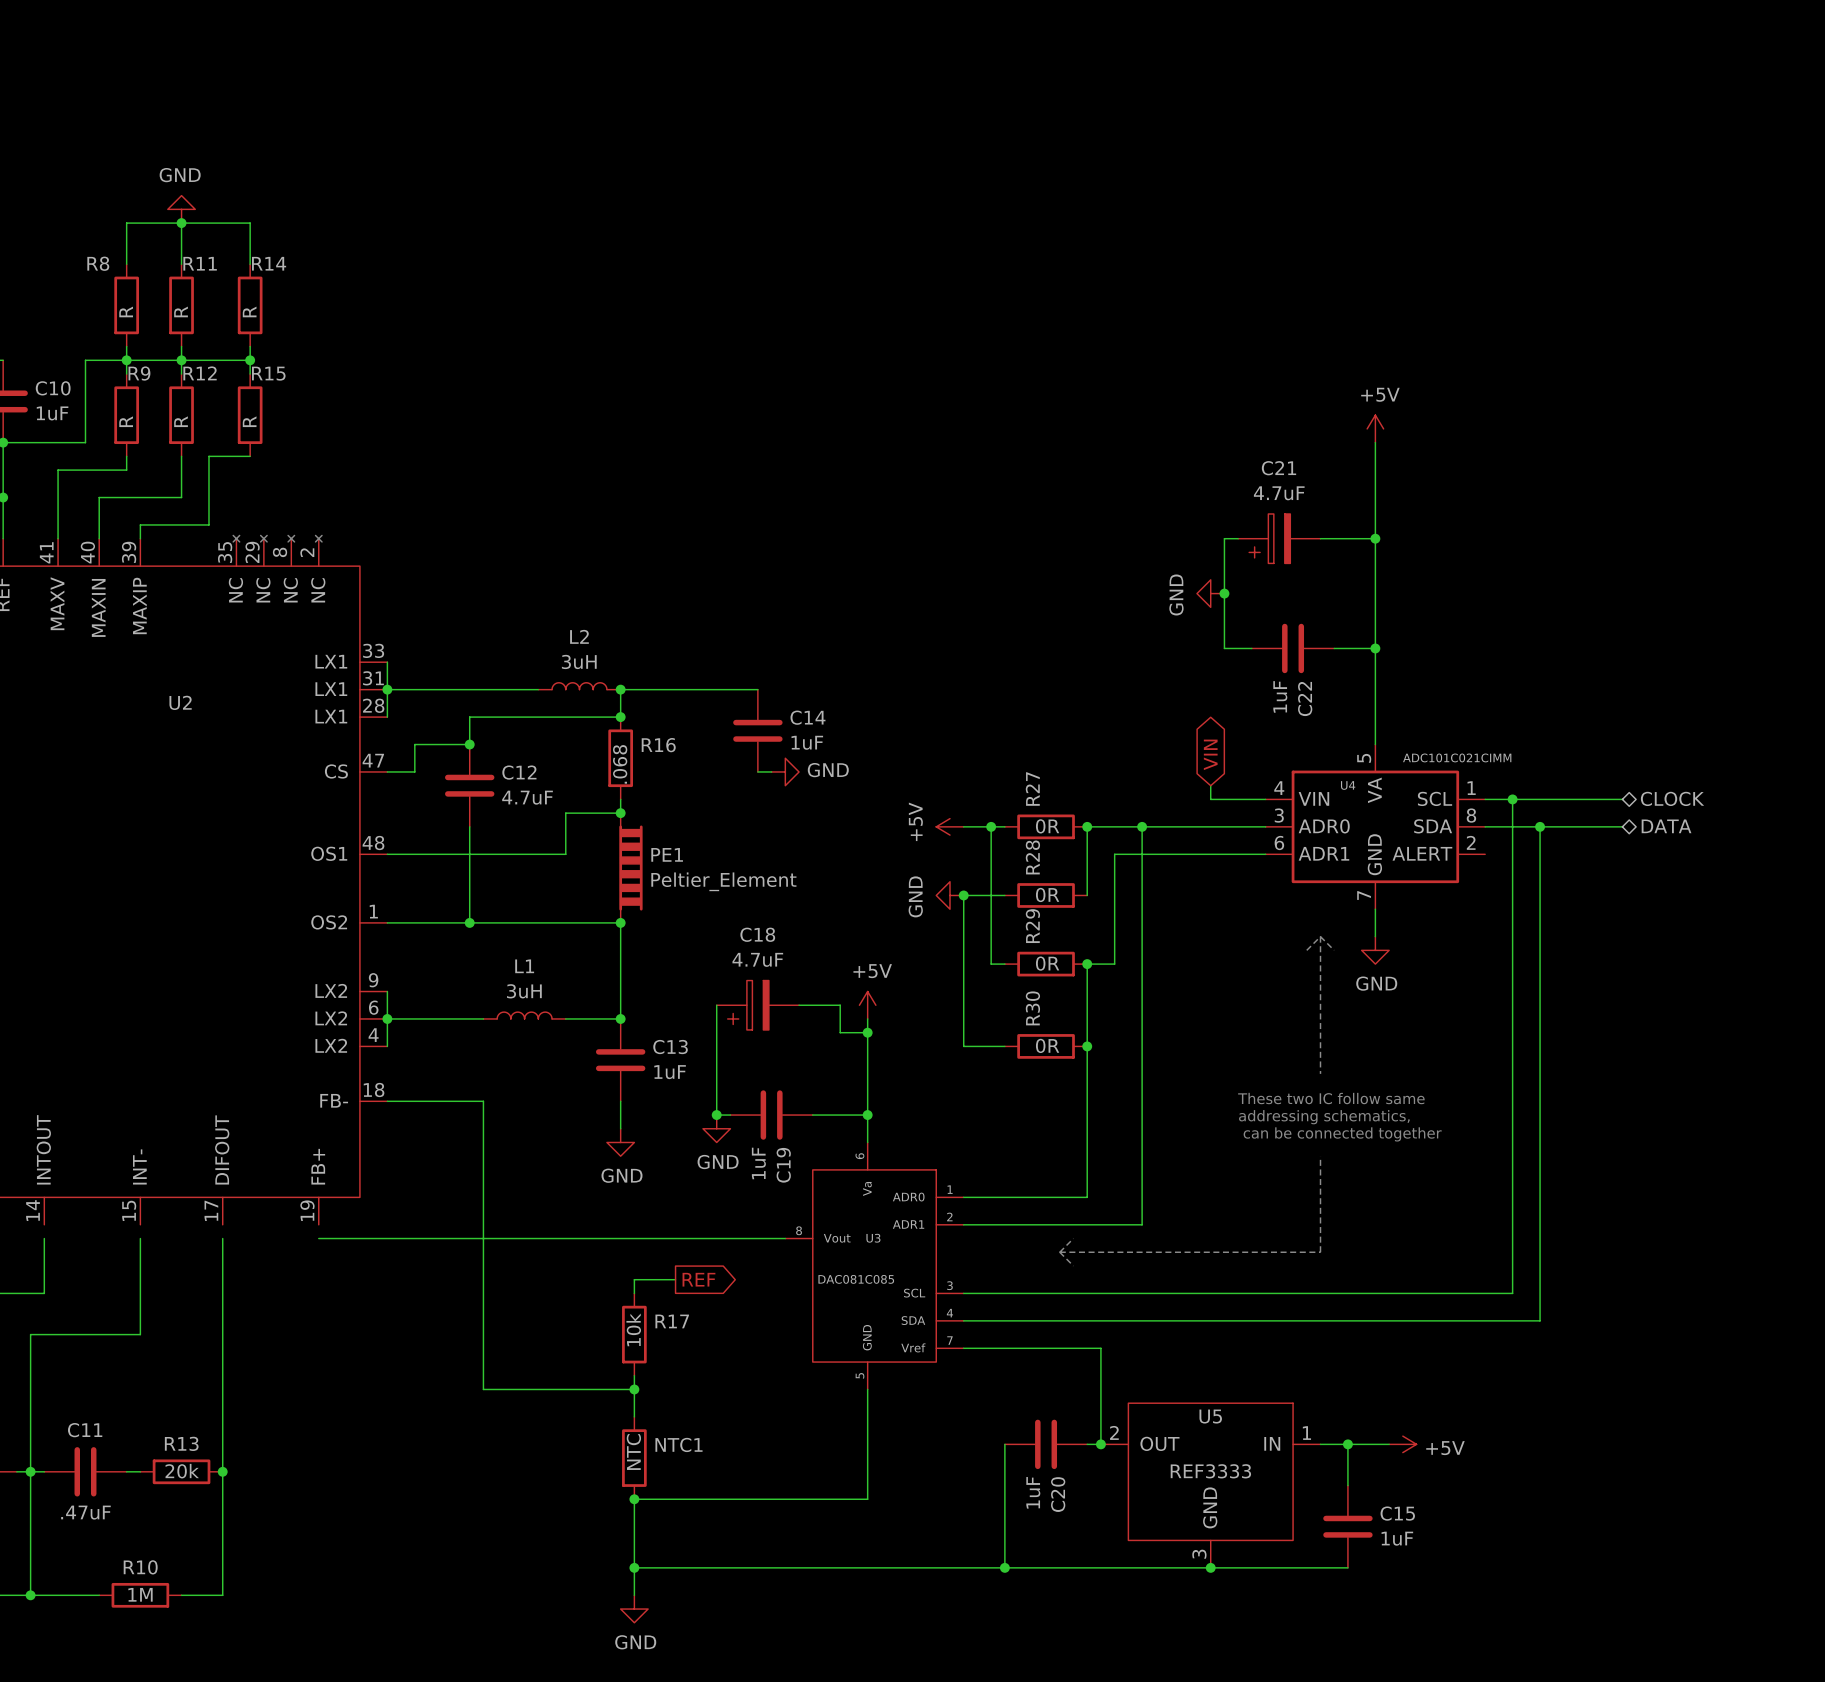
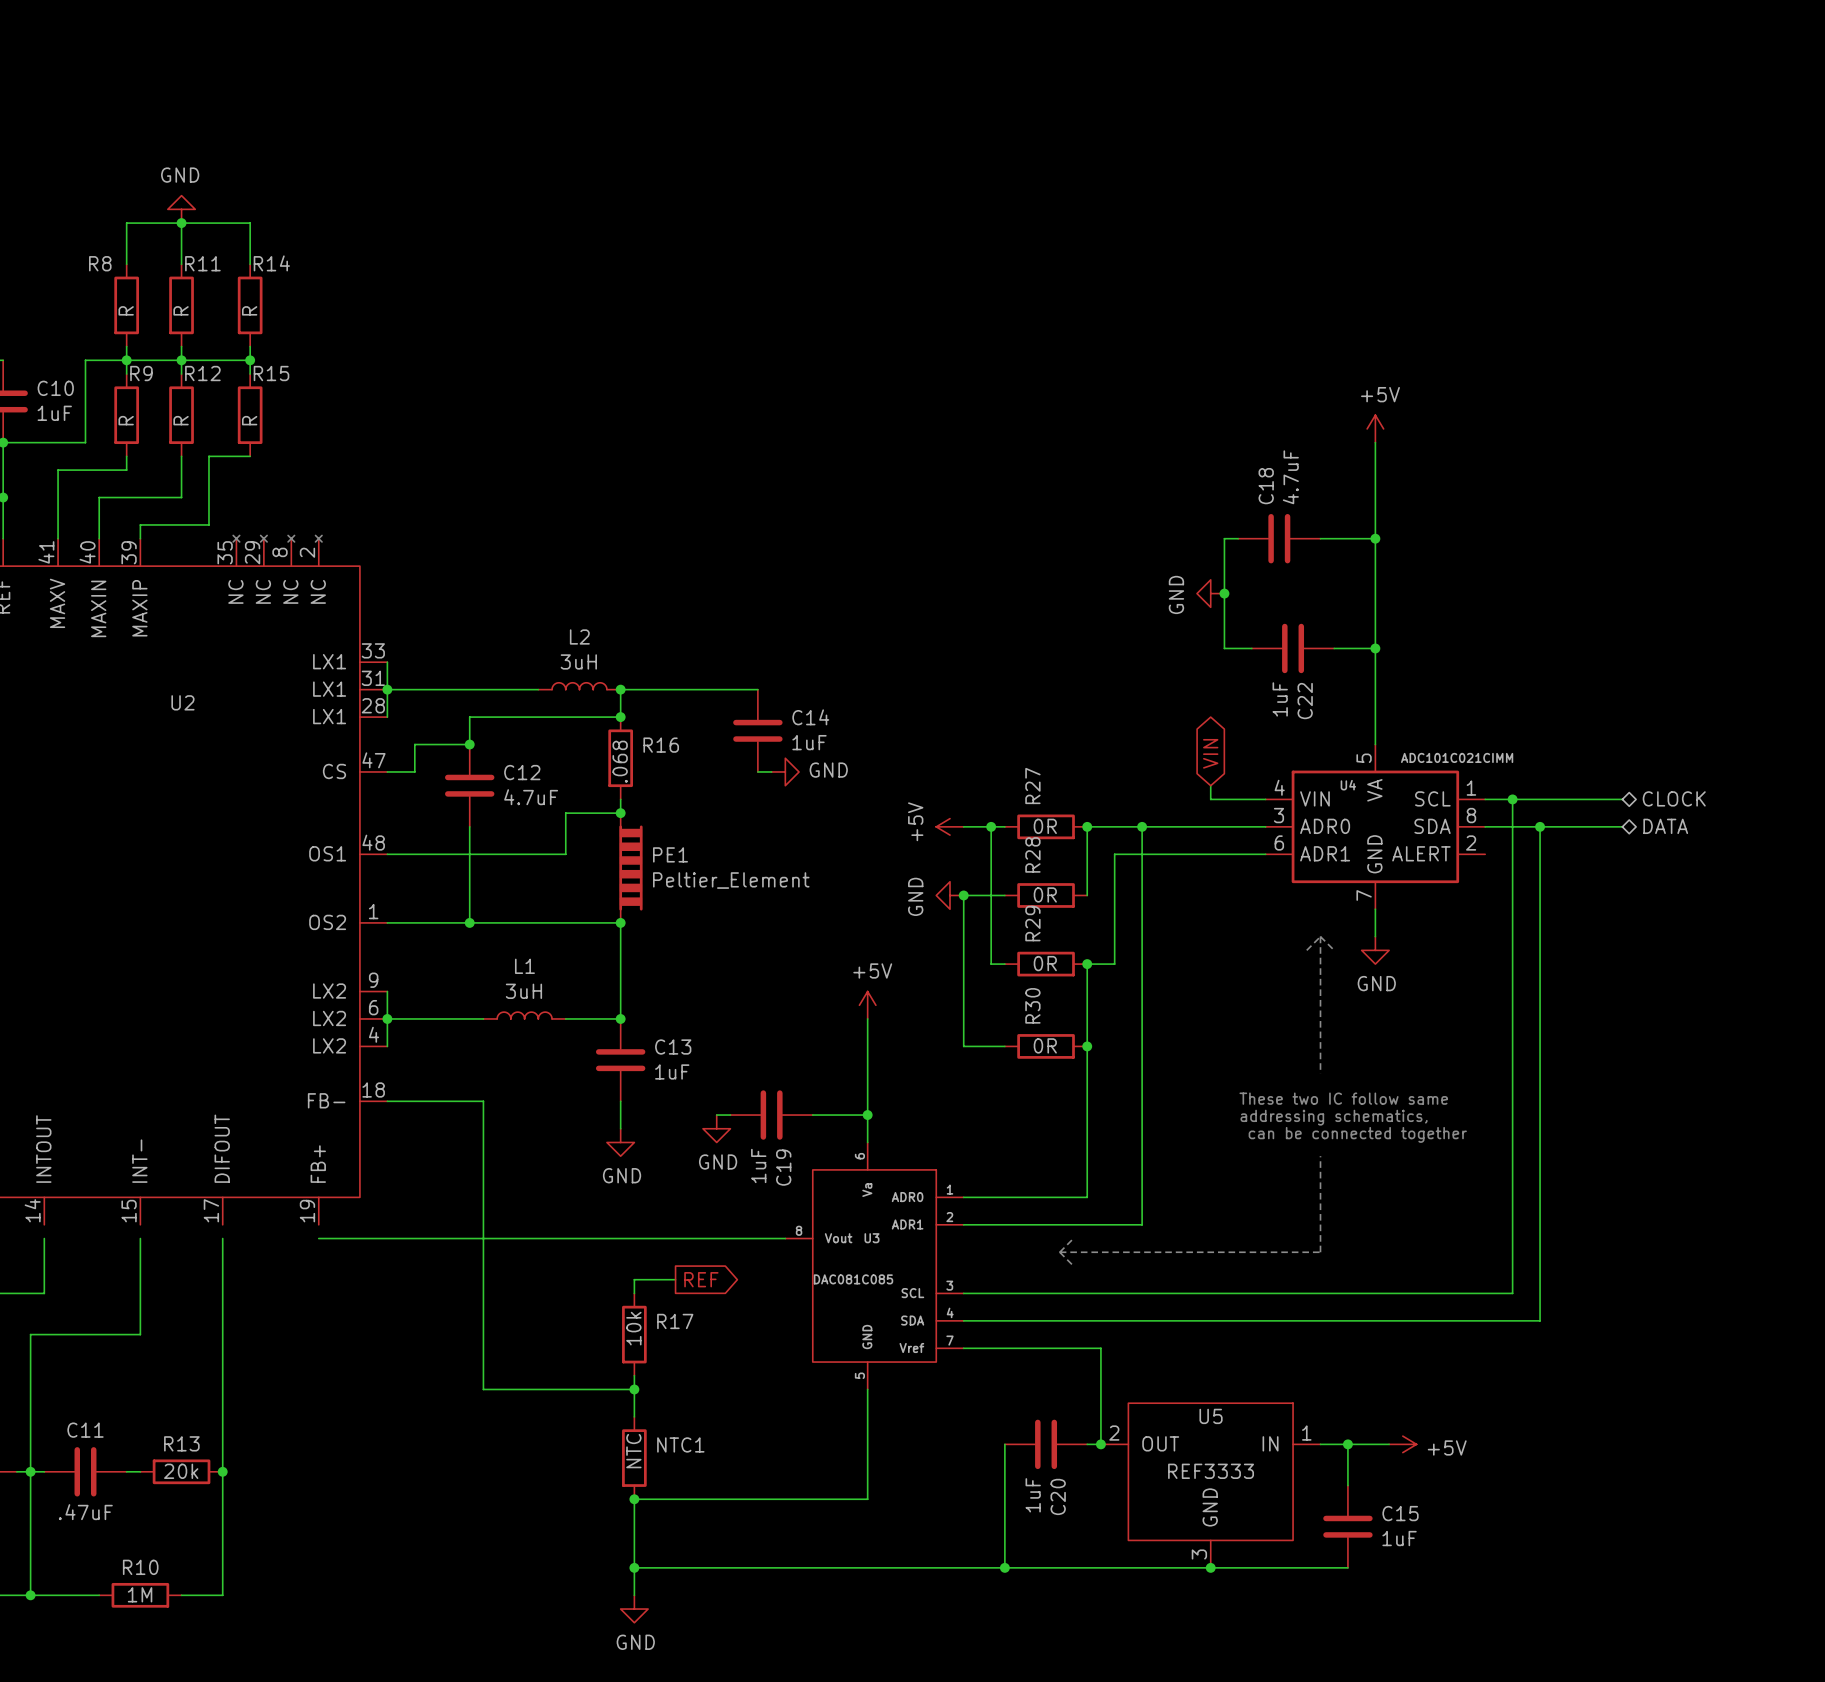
C21: 4.7uF (1279, 538) -> none
C18 value position: 4.7uF (757, 959) -> 4.7uF (1290, 477)
C18 symbol: [716, 980, 800, 1030] -> [1238, 513, 1321, 564]
wire: (716, 1005) (716, 1115) -> none
wire: (799, 1005) (840, 1005) (840, 1032) (867, 1032) -> none
junction: (867, 1032) -> none
junction: (716, 1115) -> none

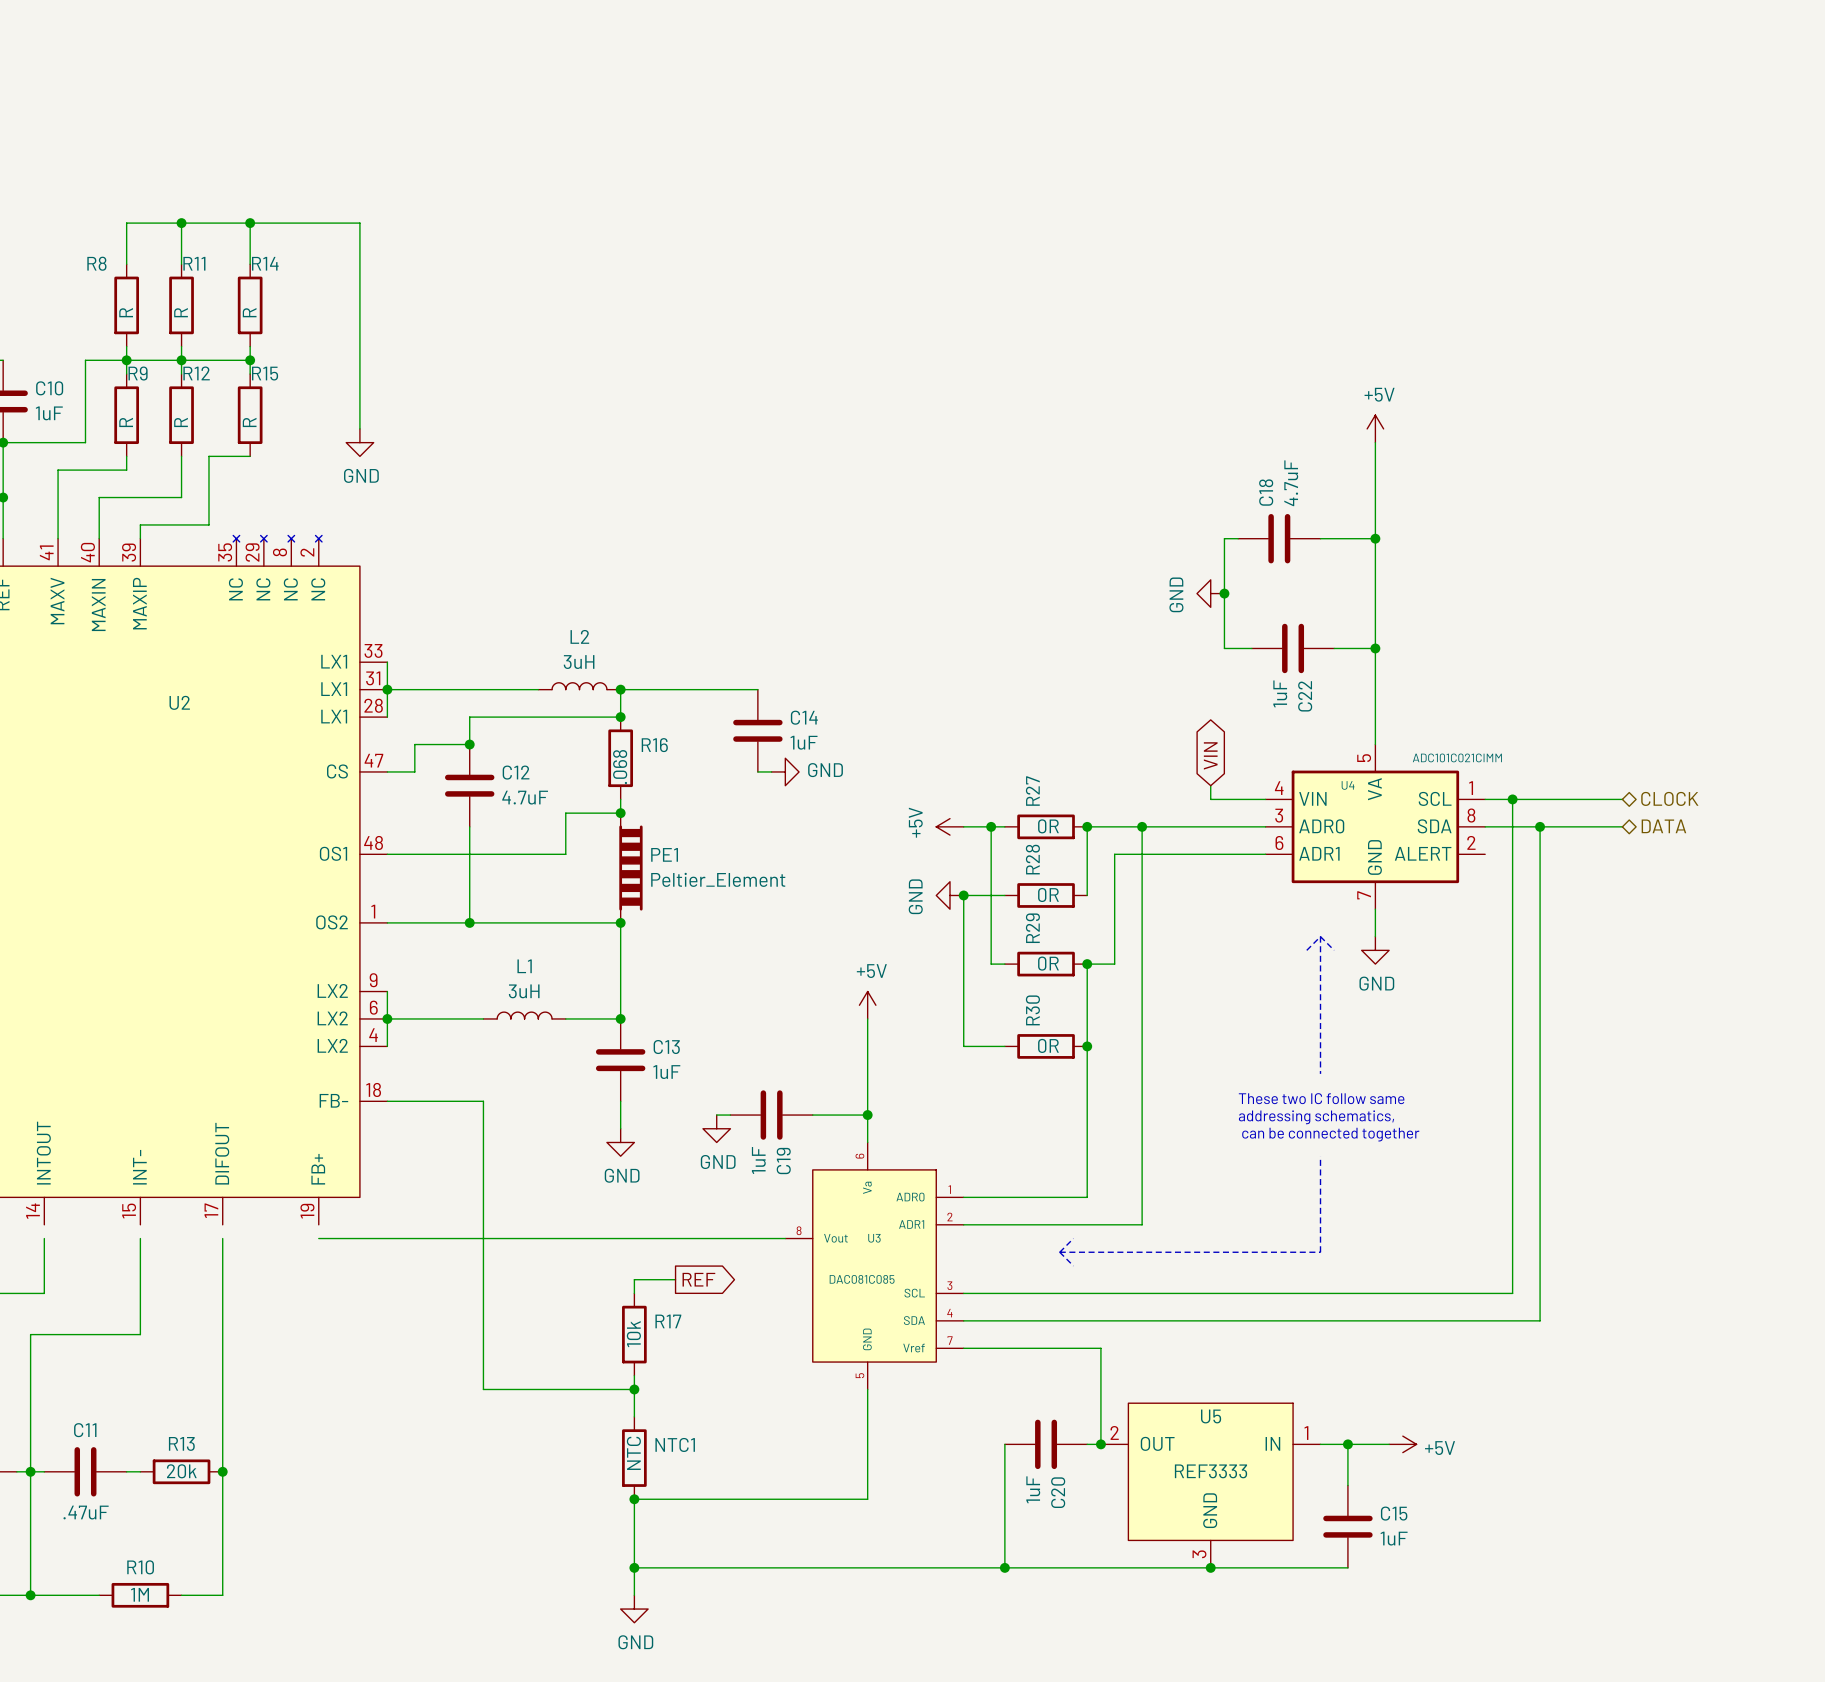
power symbol: GND (181, 209) -> none
wire: none -> (250, 223) (359, 223) (359, 428)
junction: none -> (250, 223)
power symbol: none -> GND (359, 442)

